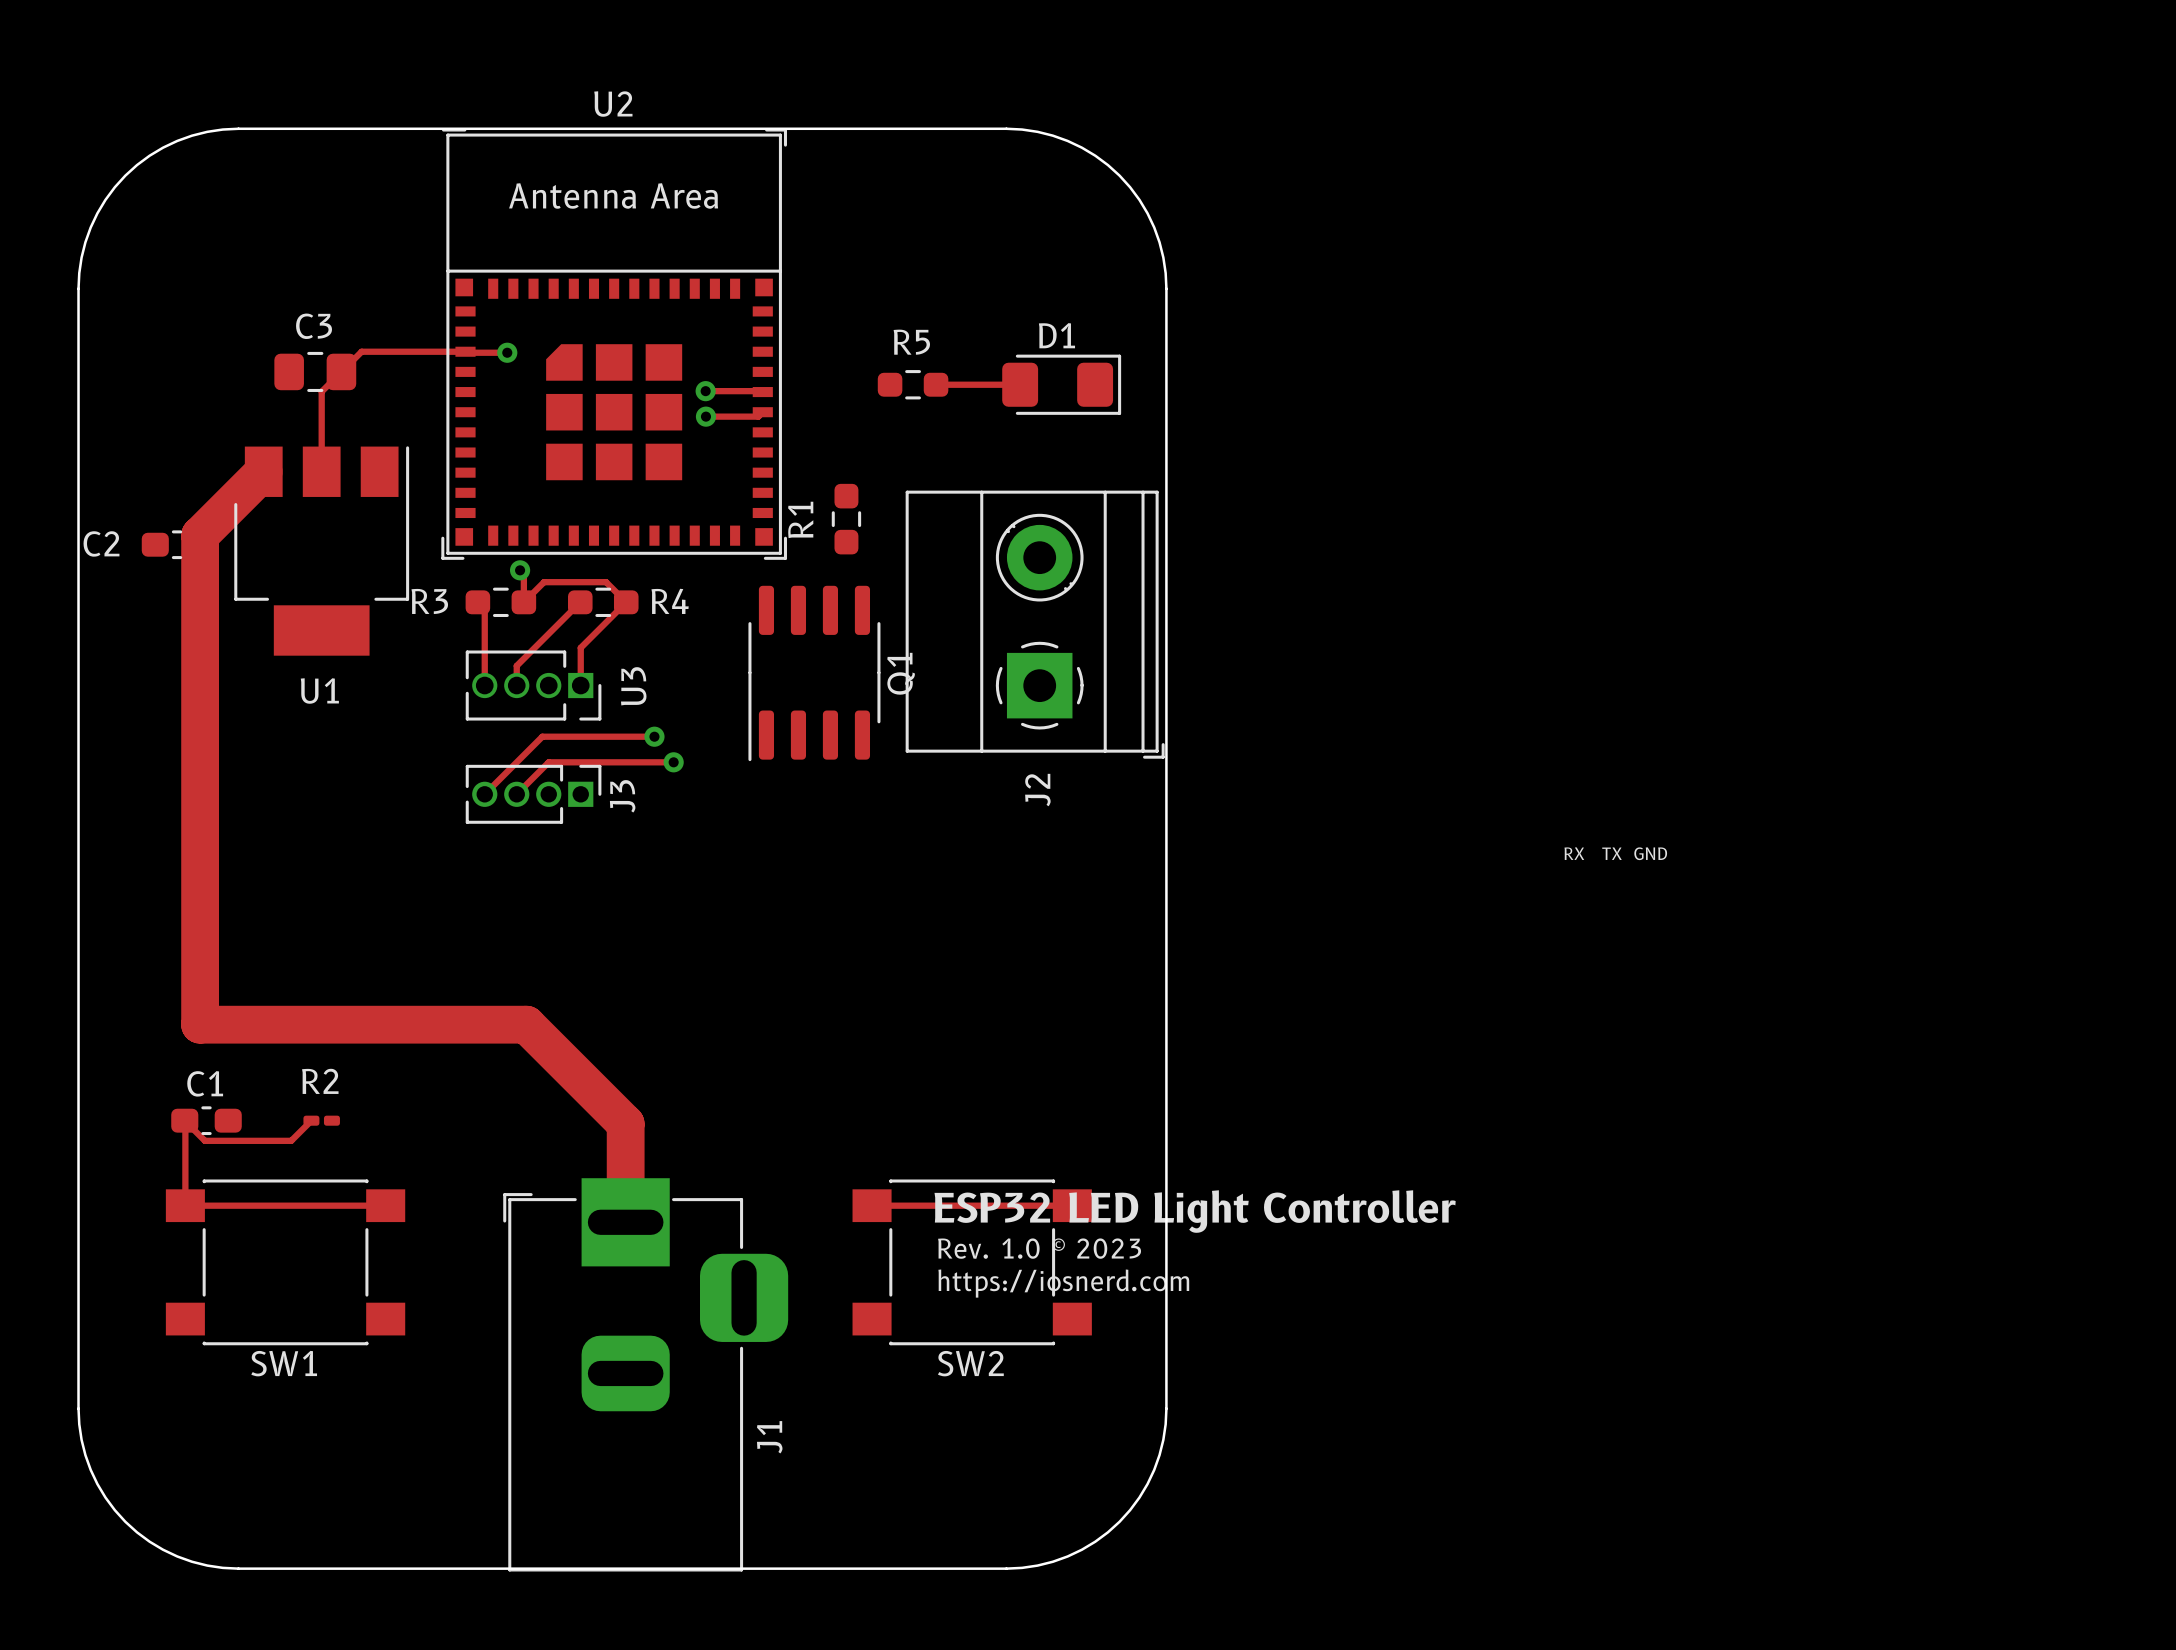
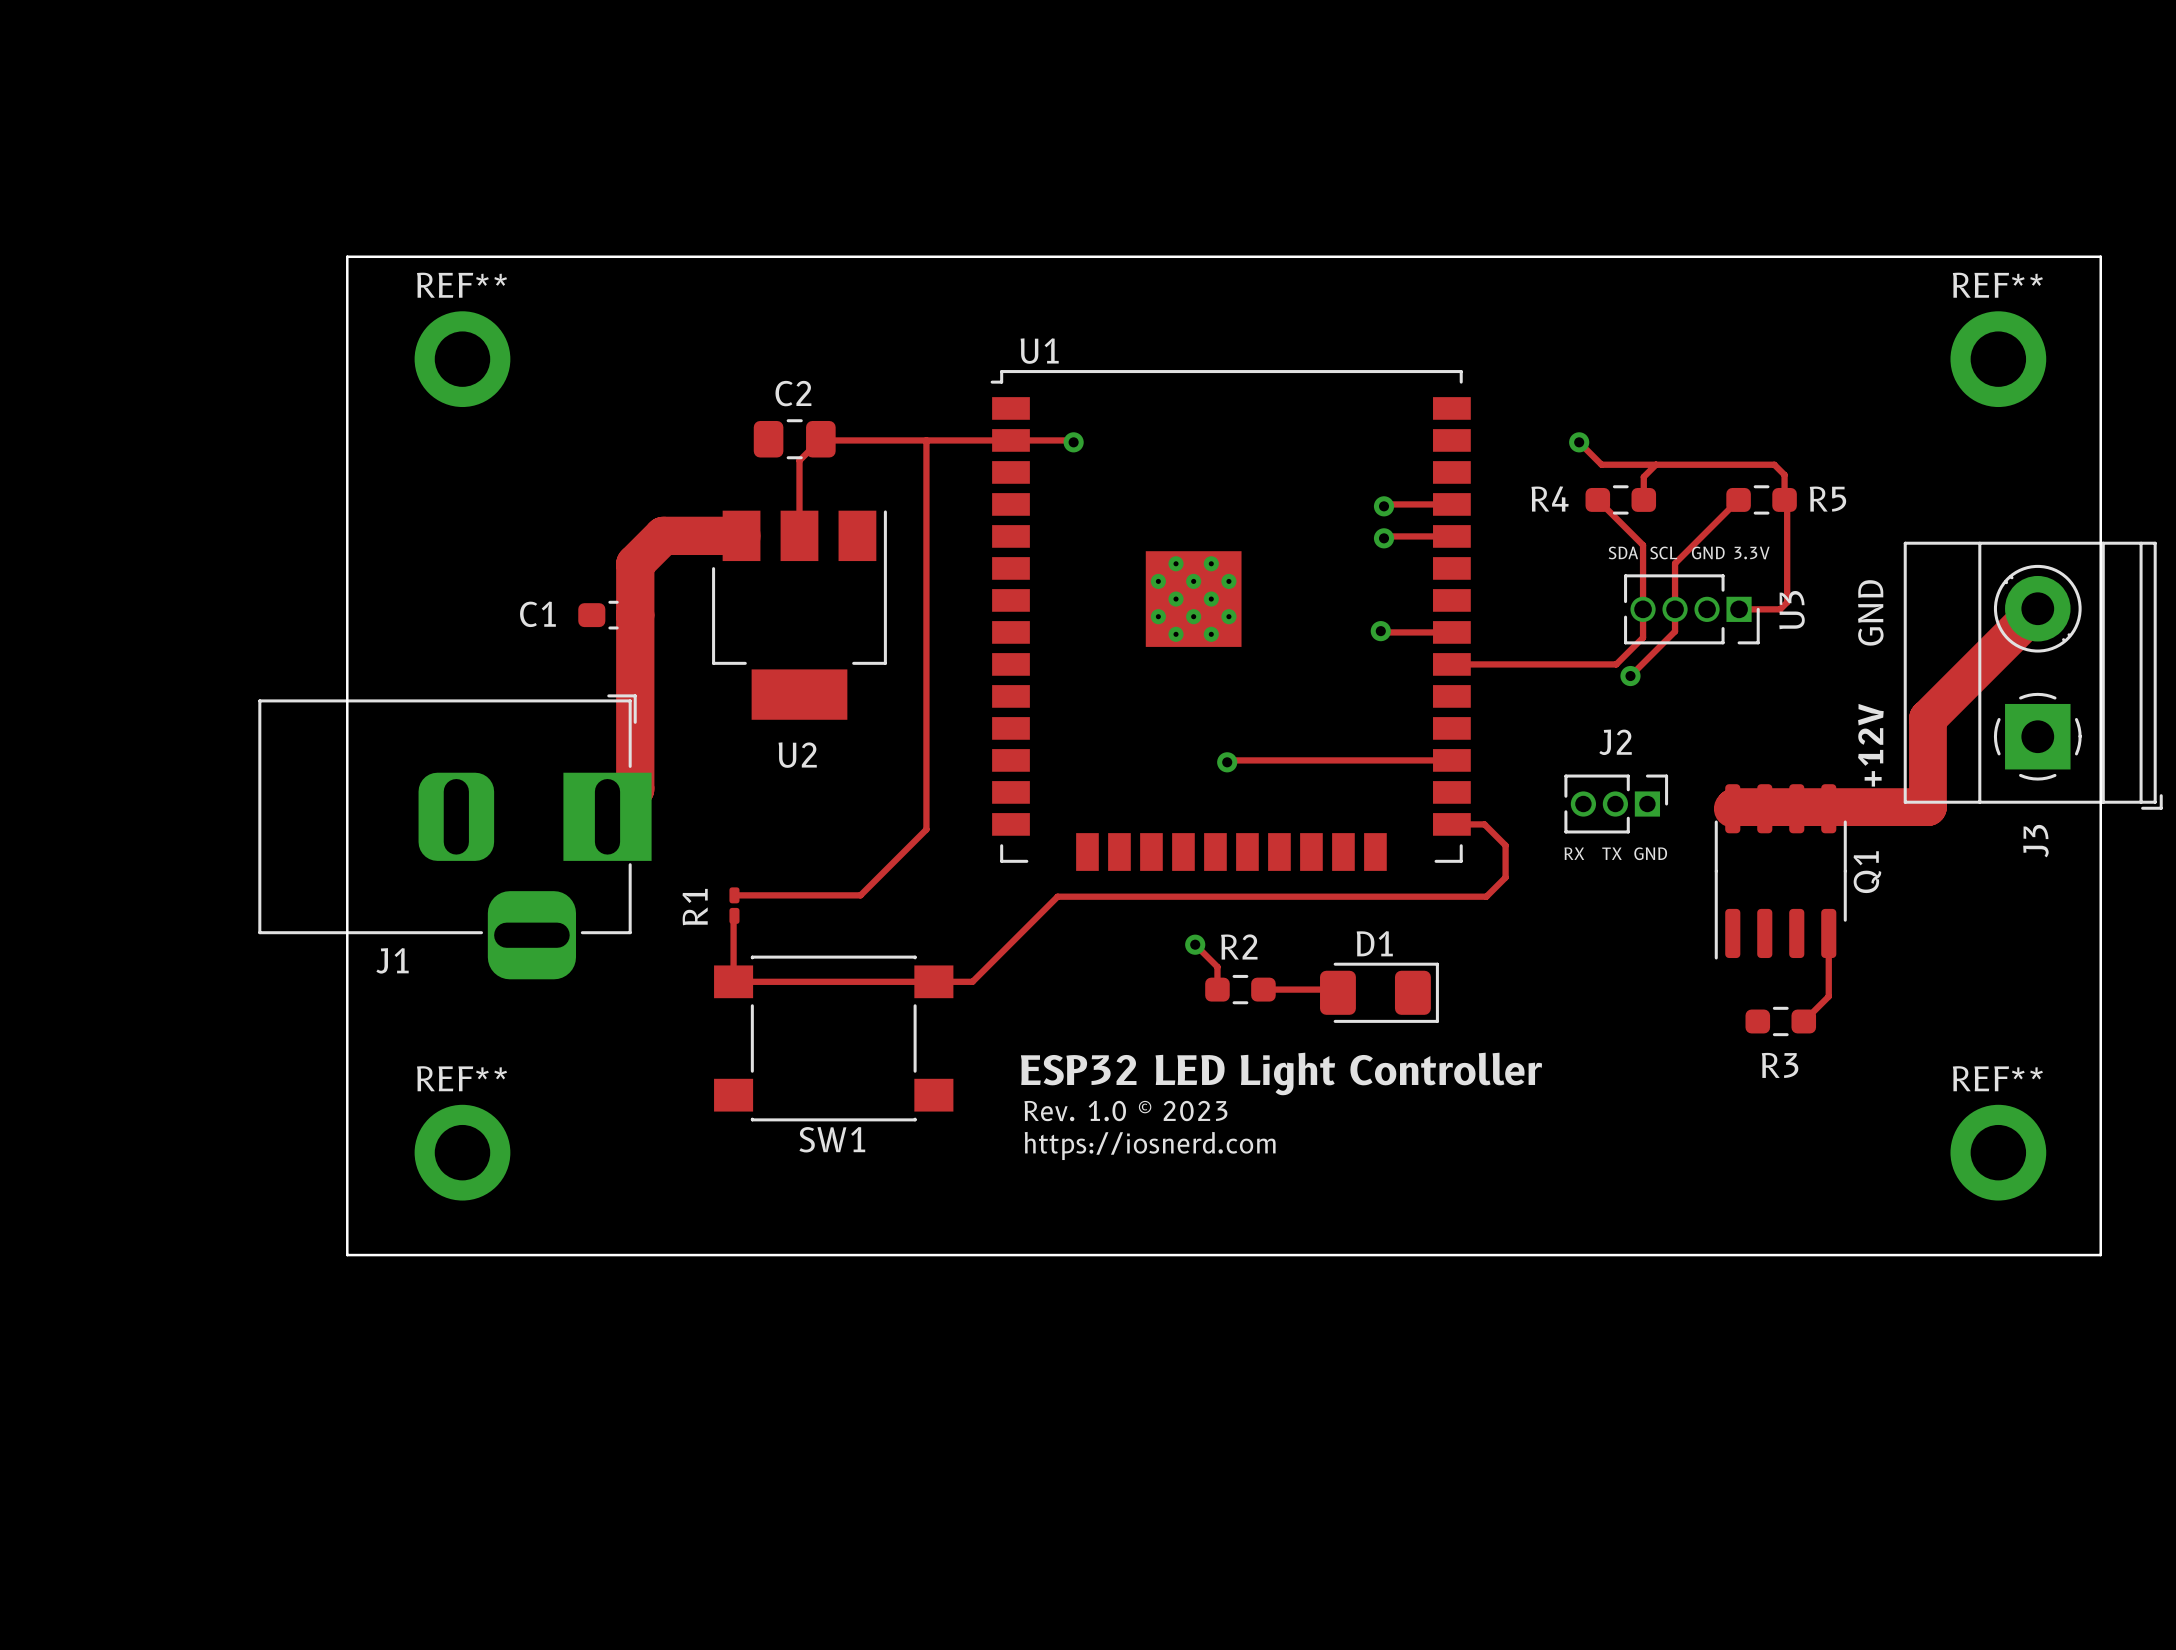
U2 name position: U2 (613, 104) -> U2 (797, 755)
board edge: (238, 128) (1022, 129) (1052, 135) (1067, 140) (1095, 155) (1119, 175) (1139, 199) (1154, 227) (1159, 242) (1165, 273) (1166, 288) (1166, 1408) (1165, 1424) (1159, 1455) (1147, 1484) (1130, 1510) (1119, 1521) (1095, 1541) (1081, 1549) (1052, 1561) (1037, 1565) (1006, 1568) (238, 1568) (222, 1567) (192, 1561) (163, 1549) (137, 1532) (114, 1510) (105, 1497) (97, 1484) (85, 1455) (81, 1439) (78, 1408) (79, 273) (85, 242) (97, 213) (114, 187) (137, 165) (163, 147) (192, 135) (222, 129) (238, 128) -> none
U2 footprint: [441, 128, 787, 560] -> [712, 510, 887, 720]
board edge: none -> (347, 256) (2100, 256) (2100, 1255) (347, 1255) (347, 256)
R5 name position: R5 (911, 342) -> R5 (1827, 499)
track: (507, 352) (361, 351) (321, 391) (321, 471) -> none
via: (507, 352) -> none
REF**: none -> (462, 359)
REF**: none -> (1998, 359)
C3: (315, 371) -> none
R5 position: (913, 384) -> (1761, 499)
track: (936, 384) (1020, 384) -> none
D1 position: (1061, 384) -> (1379, 992)
track: (705, 391) (762, 392) -> none
via: (705, 391) -> none
track: (762, 412) (758, 416) (705, 416) -> none
via: (705, 416) -> none
track: none -> (926, 440) (926, 829) (860, 895) (734, 895)
track: none -> (1073, 442) (1071, 440) (820, 439) (799, 460) (799, 535)
via: none -> (1073, 442)
track: none -> (1579, 442) (1601, 464) (1774, 464) (1784, 474) (1784, 499) (1787, 502) (1787, 602) (1780, 609) (1739, 609)
via: none -> (1579, 442)
U1 footprint: [234, 446, 410, 656] -> [990, 370, 1471, 871]
track: none -> (1655, 464) (1643, 476) (1643, 499)
track: (263, 471) (200, 535) (200, 1024) (526, 1024) (625, 1123) (625, 1222) -> none
R1 footprint: [831, 483, 862, 555] -> [729, 887, 740, 924]
J2 footprint: [905, 490, 1165, 759] -> [1564, 774, 1669, 834]
track: none -> (1597, 499) (1643, 545) (1643, 637) (1616, 664) (1451, 664)
track: none -> (1738, 499) (1675, 563) (1675, 631) (1630, 676)
track: none -> (1451, 504) (1385, 504) (1384, 506)
via: none -> (1384, 506)
C2 footprint: [141, 530, 213, 560] -> [753, 419, 836, 460]
track: none -> (741, 535) (663, 535) (635, 563) (635, 789) (607, 816)
track: none -> (1451, 536) (1385, 536) (1384, 538)
via: none -> (1384, 538)
C2 name position: C2 (101, 543) -> C2 (793, 393)
text: none -> SDA (1623, 552)
text: none -> SCL (1663, 552)
text: none -> GND (1708, 552)
text: none -> 3.3V (1752, 552)
track: (520, 570) (523, 574) (523, 602) (544, 582) (606, 582) (626, 602) (580, 647) (580, 685) -> none
via: (520, 570) -> none
R3 name position: R3 (429, 601) -> R3 (1780, 1065)
R4 name position: R4 (670, 601) -> R4 (1550, 498)
track: (477, 602) (484, 609) (484, 685) -> none
R3 position: (500, 602) -> (1780, 1021)
track: (580, 602) (516, 665) (516, 685) -> none
R4 position: (603, 602) -> (1620, 499)
track: none -> (2037, 608) (1927, 718) (1927, 807) (1734, 807) (1732, 808) (1828, 808)
text: none -> GND (1870, 612)
track: none -> (1380, 631) (1451, 632)
via: none -> (1380, 631)
Q1 position: (814, 673) -> (1780, 871)
via: none -> (1630, 676)
U3 position: (533, 685) -> (1691, 609)
U1 name position: U1 (319, 691) -> U1 (1039, 351)
track: (654, 736) (542, 736) (484, 794) -> none
via: (654, 736) -> none
text: none -> +12V (1870, 745)
track: none -> (1451, 760) (1229, 760) (1227, 762)
track: (673, 762) (548, 762) (516, 794) -> none
via: (673, 762) -> none
via: none -> (1227, 762)
J3 footprint: [465, 764, 602, 824] -> [1903, 541, 2163, 810]
J2 name position: J2 (1037, 790) -> J2 (1615, 742)
J3 name position: J3 (622, 796) -> J3 (2035, 841)
track: none -> (1451, 824) (1484, 824) (1505, 845) (1505, 877) (1486, 896) (1057, 896) (972, 981) (733, 981) (734, 915)
track: none -> (1828, 933) (1828, 996) (1803, 1021)
track: none -> (1195, 944) (1217, 966) (1217, 989)
via: none -> (1195, 944)
track: none -> (1263, 989) (1334, 989) (1337, 992)
C1 name position: C1 (205, 1083) -> C1 (537, 614)
R2 footprint: [303, 1115, 340, 1126] -> [1205, 974, 1276, 1005]
track: (184, 1120) (204, 1140) (291, 1140) (311, 1120) -> none
C1 position: (206, 1120) -> (613, 615)
track: (185, 1121) (185, 1205) (385, 1205) -> none
REF**: none -> (462, 1152)
REF**: none -> (1998, 1152)
track: (872, 1205) (1072, 1205) -> none
text position: ESP32 LED Light Controller (1195, 1211) -> ESP32 LED Light Controller (1281, 1073)
text position: Rev. 1.0 © 2023 (1039, 1248) -> Rev. 1.0 © 2023 (1125, 1111)
SW1 position: (285, 1262) -> (833, 1038)
SW2: (972, 1262) -> none
text position: https://iosnerd.com (1063, 1283) -> https://iosnerd.com (1150, 1145)
J1 rotation: 0° (645, 1374) -> 90° clockwise (454, 836)
J1 position: (645, 1374) -> (454, 836)

